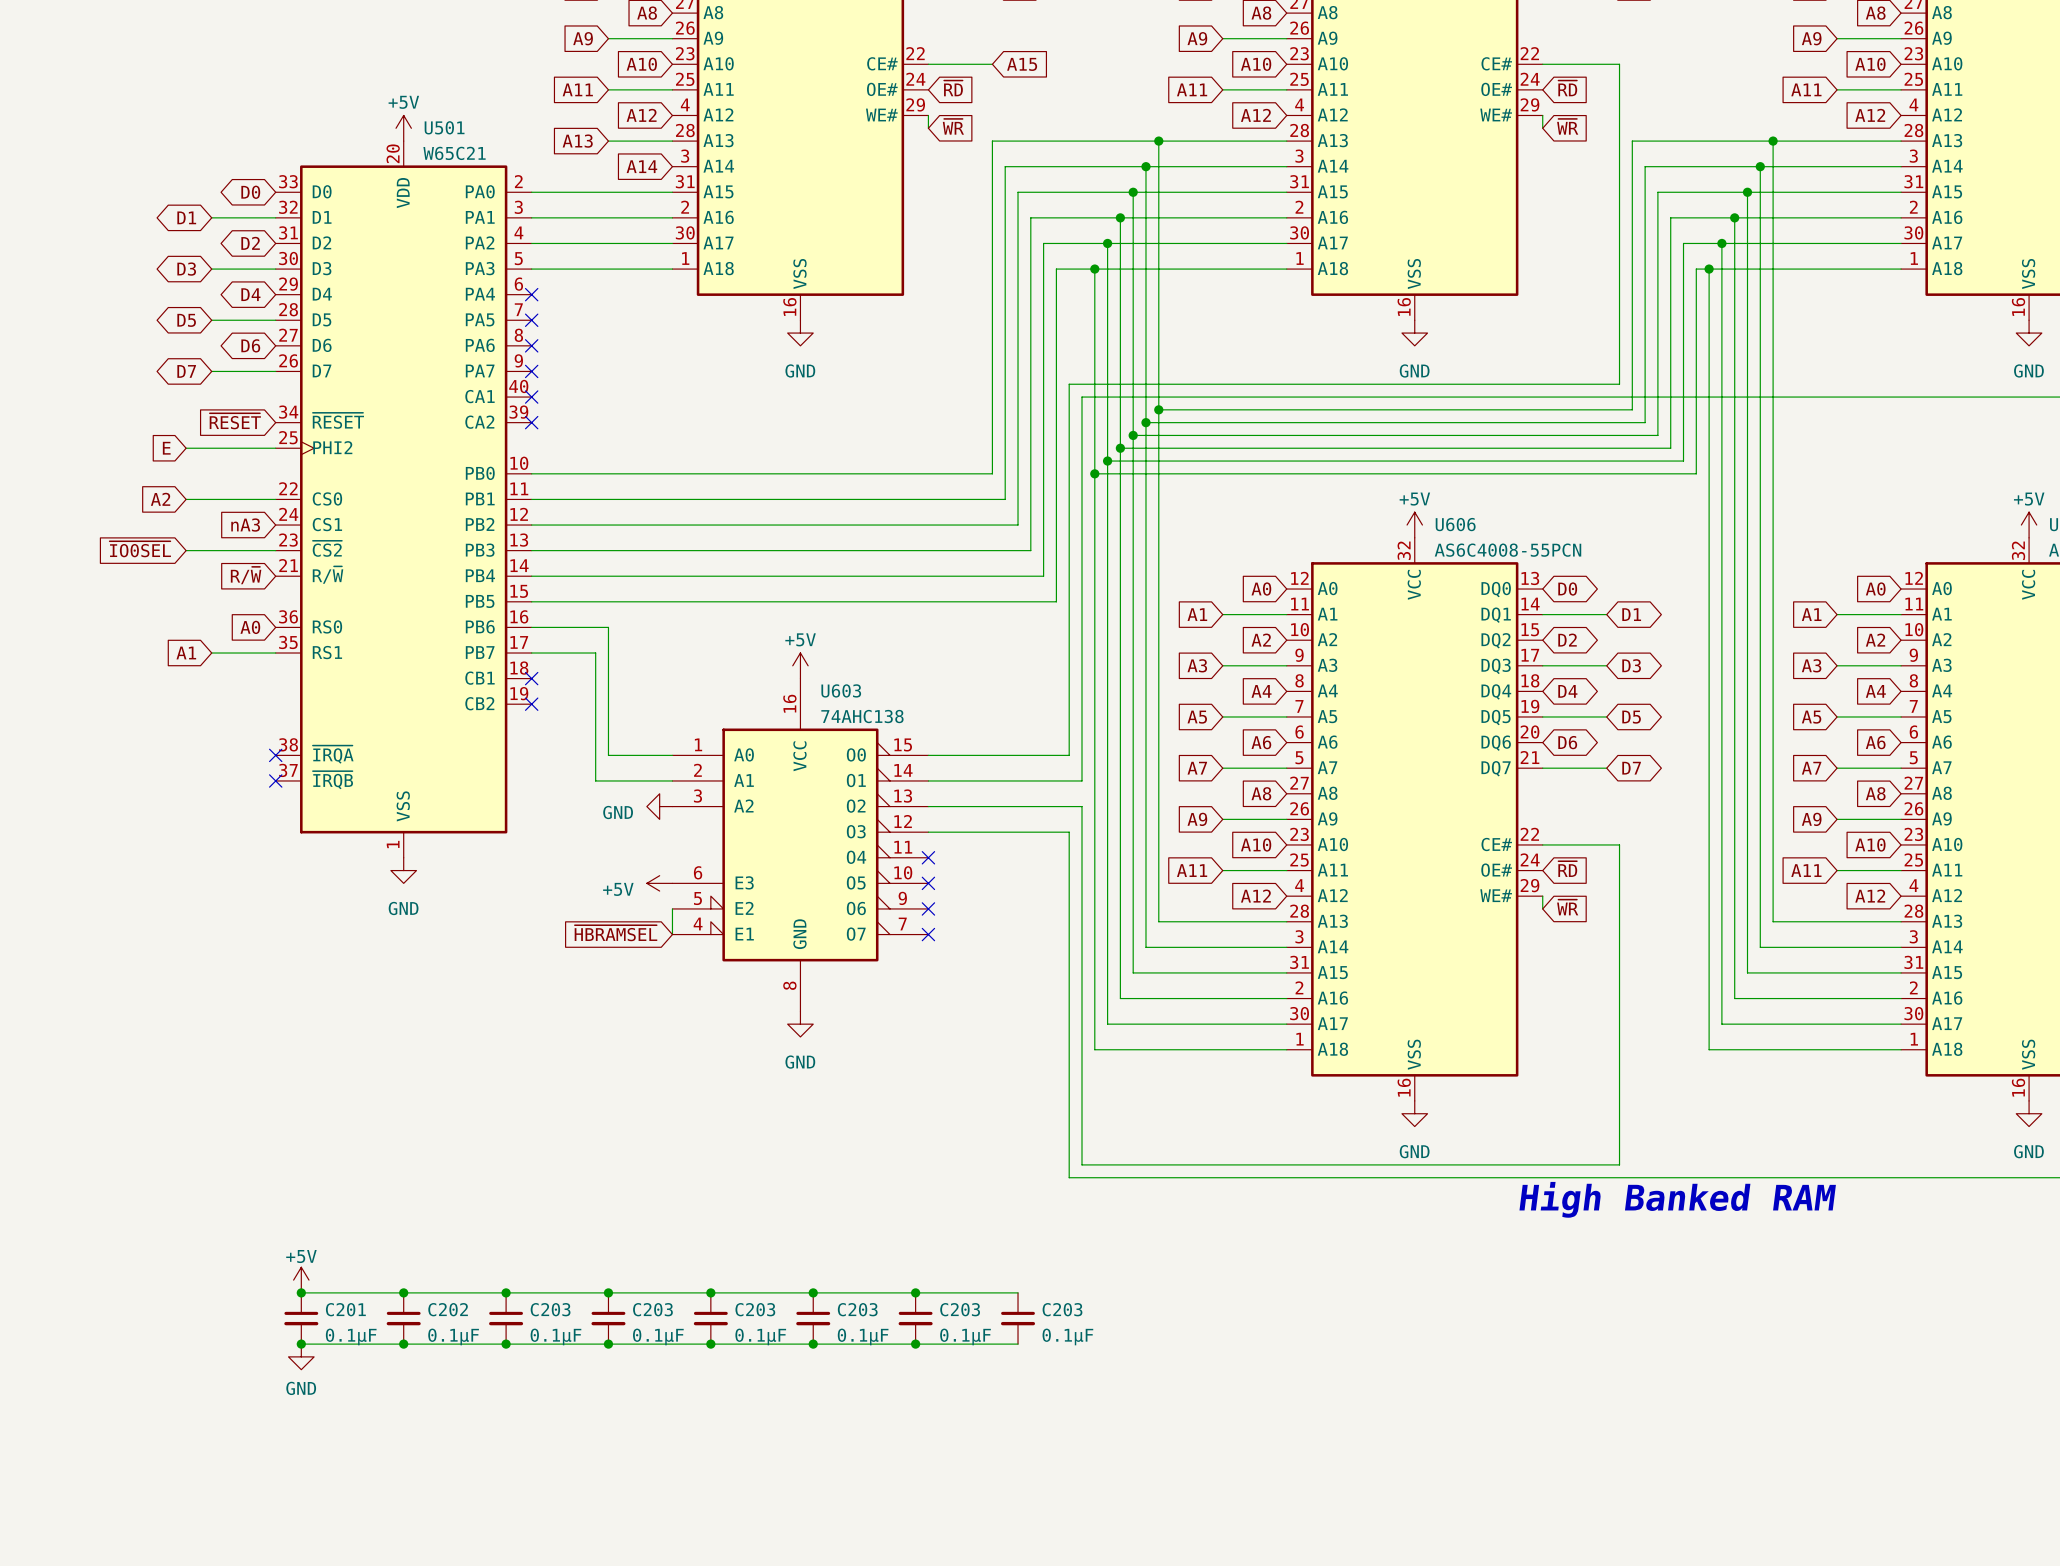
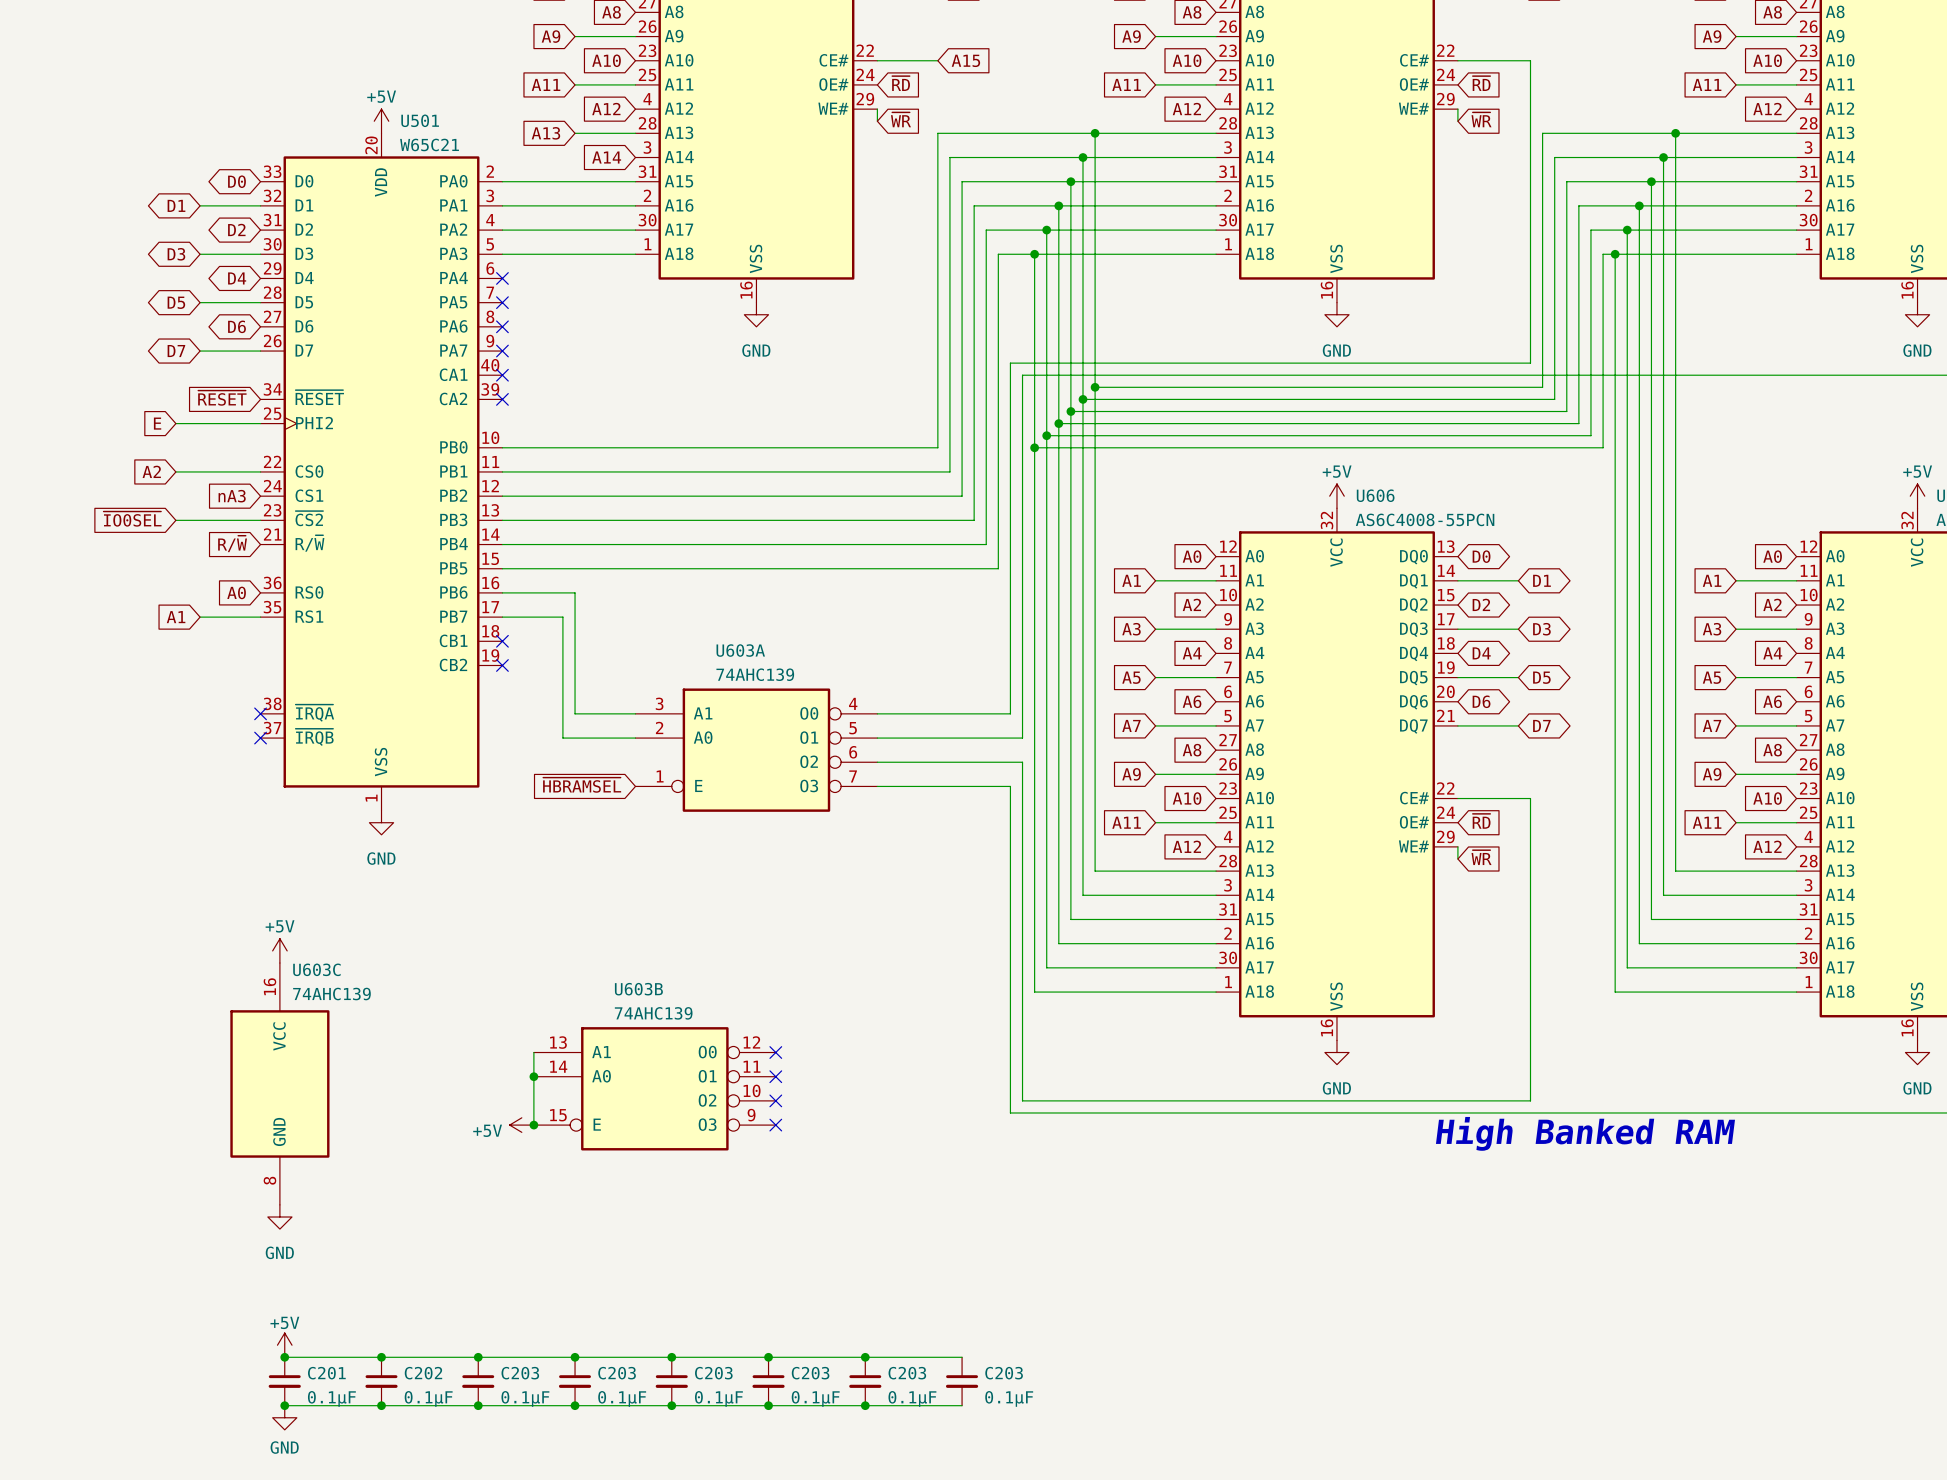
power symbol: +5V (800, 665) -> none
U603A: none -> 74AHC139 (756, 750)
power symbol: GND (659, 806) -> none
U603: 74AHC138 (800, 844) -> none
no-connect mark: (928, 857) -> none
power symbol: +5V (659, 883) -> none
no-connect mark: (928, 883) -> none
wire: (672, 908) (672, 934) -> none
no-connect mark: (928, 908) -> none
global label position: ~{HBRAMSEL} (615, 933) -> ~{HBRAMSEL} (582, 785)
no-connect mark: (928, 934) -> none
power symbol: none -> +5V (279, 950)
power symbol: GND (800, 1024) -> none
wire: none -> (533, 1052) (533, 1125)
no-connect mark: none -> (775, 1052)
junction: none -> (533, 1076)
no-connect mark: none -> (775, 1076)
U603C: none -> 74AHC139 (279, 1083)
U603B: none -> 74AHC139 (654, 1088)
no-connect mark: none -> (775, 1100)
power symbol: none -> +5V (521, 1125)
junction: none -> (533, 1125)
no-connect mark: none -> (775, 1125)
power symbol: +5V (301, 1280) -> GND (279, 1217)
wire: (301, 1292) (1018, 1292) -> (284, 1357) (962, 1357)
junction: (301, 1292) -> none
junction: (403, 1292) -> none
junction: (506, 1292) -> none
junction: (608, 1292) -> none
junction: (710, 1292) -> none
junction: (813, 1292) -> none
junction: (915, 1292) -> none
C201 position: (301, 1318) -> (284, 1381)
C202 position: (403, 1318) -> (381, 1381)
C203: 0.1µF (506, 1318) -> none
C203: 0.1µF (608, 1318) -> none
C203: 0.1µF (710, 1318) -> none
C203: 0.1µF (813, 1318) -> none
C203: 0.1µF (915, 1318) -> none
C203: 0.1µF (1018, 1318) -> none
wire: (301, 1344) (1018, 1344) -> (284, 1405) (962, 1405)
junction: (301, 1344) -> none
junction: (403, 1344) -> none
junction: (506, 1344) -> none
junction: (608, 1344) -> none
junction: (710, 1344) -> none
junction: (813, 1344) -> none
junction: (915, 1344) -> none
power symbol position: GND (301, 1356) -> GND (284, 1417)
power symbol: none -> +5V (284, 1345)
junction: none -> (284, 1357)
junction: none -> (381, 1357)
junction: none -> (478, 1357)
junction: none -> (575, 1357)
junction: none -> (671, 1357)
junction: none -> (768, 1357)
junction: none -> (865, 1357)
C203: none -> 0.1µF (478, 1381)
C203: none -> 0.1µF (575, 1381)
C203: none -> 0.1µF (671, 1381)
C203: none -> 0.1µF (768, 1381)
C203: none -> 0.1µF (865, 1381)
C203: none -> 0.1µF (962, 1381)
junction: none -> (284, 1405)
junction: none -> (381, 1405)
junction: none -> (478, 1405)
junction: none -> (575, 1405)
junction: none -> (671, 1405)
junction: none -> (768, 1405)
junction: none -> (865, 1405)

